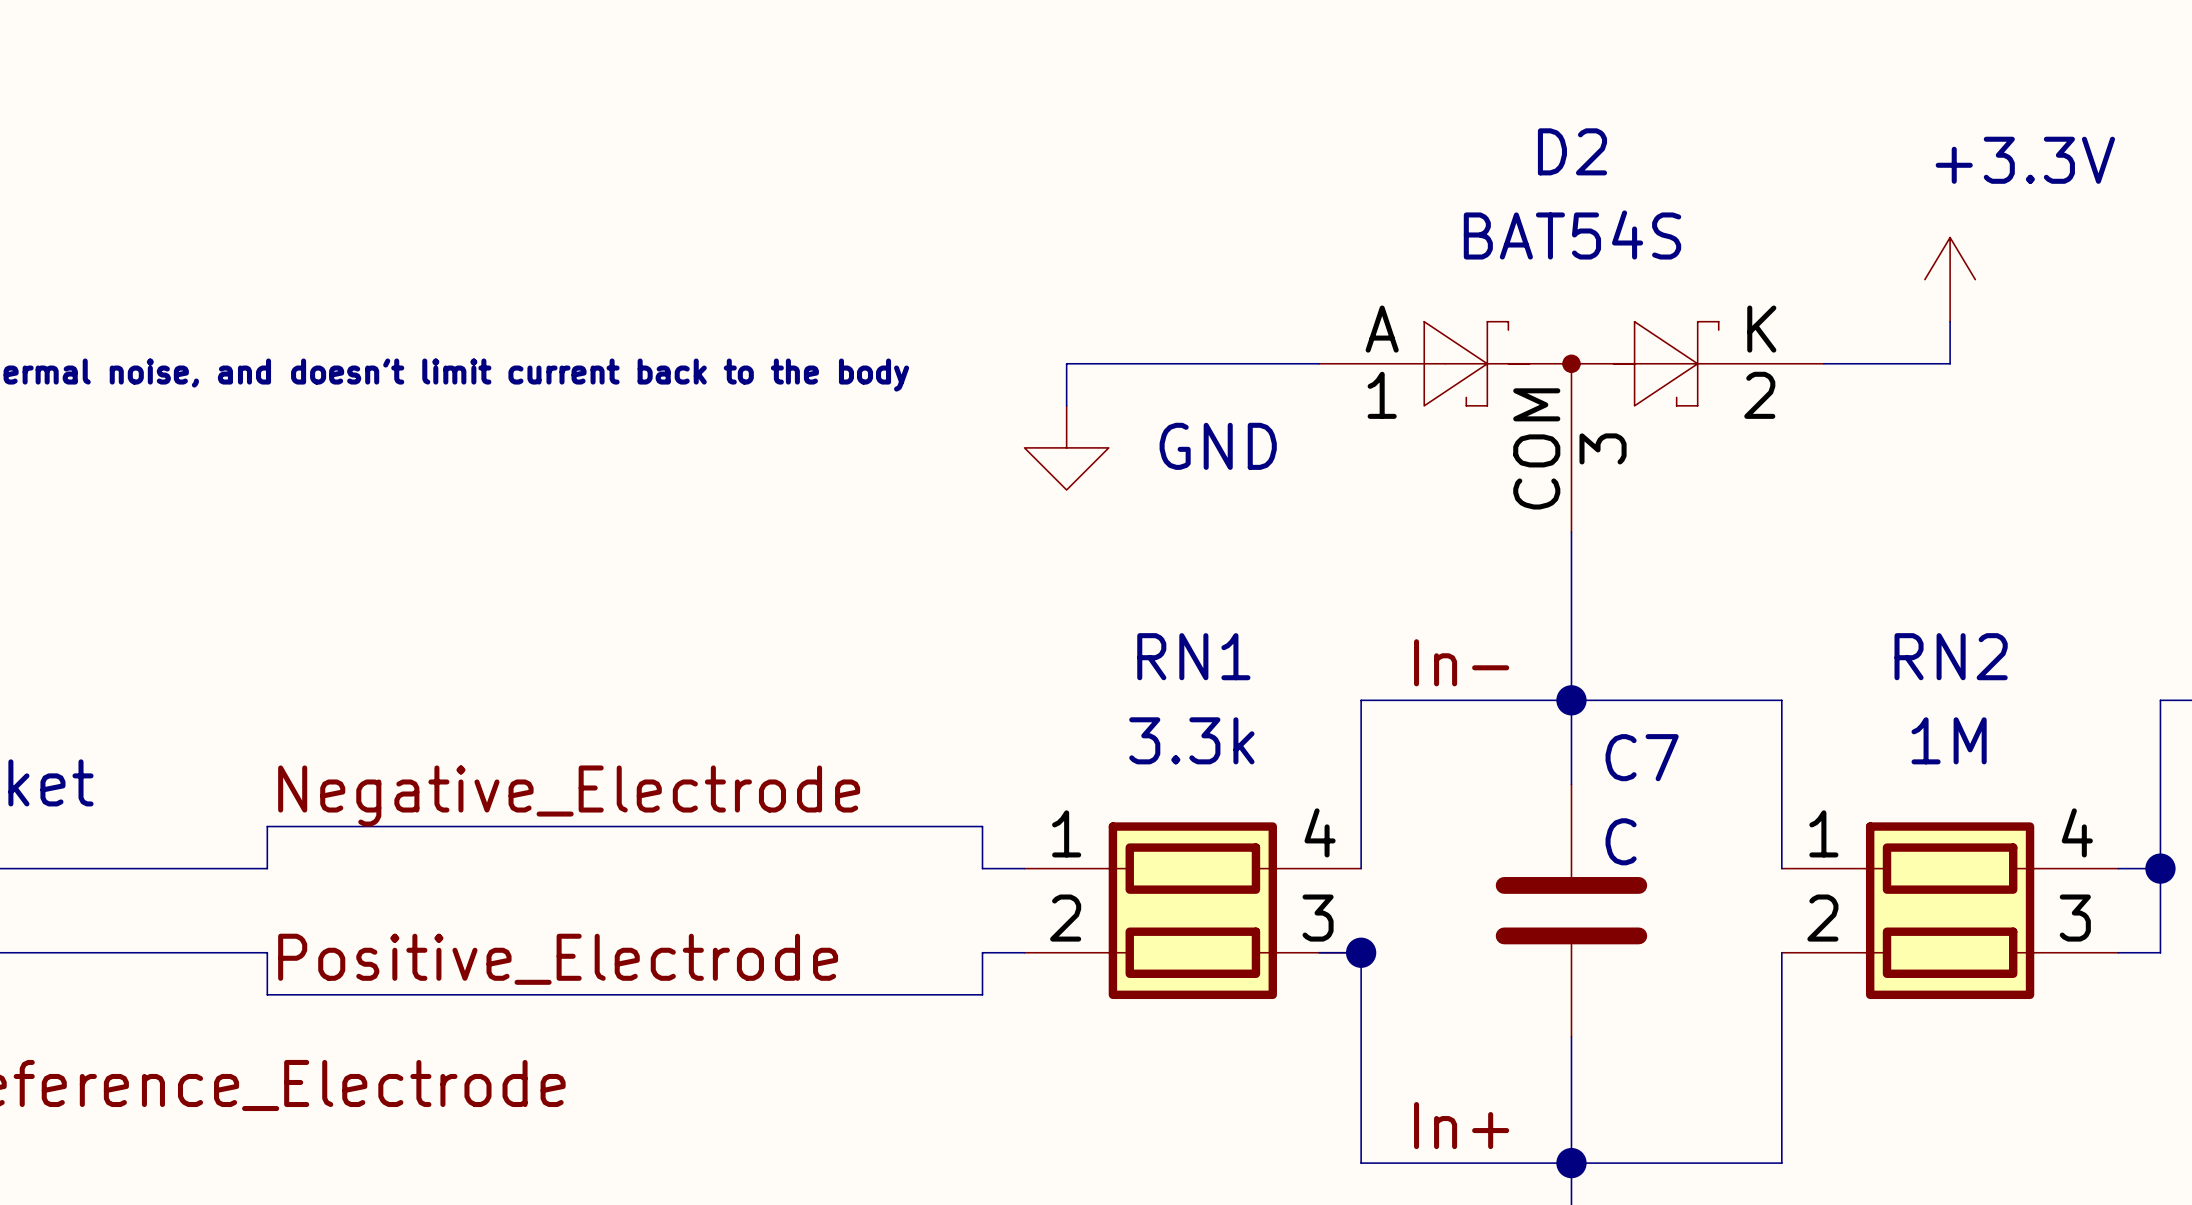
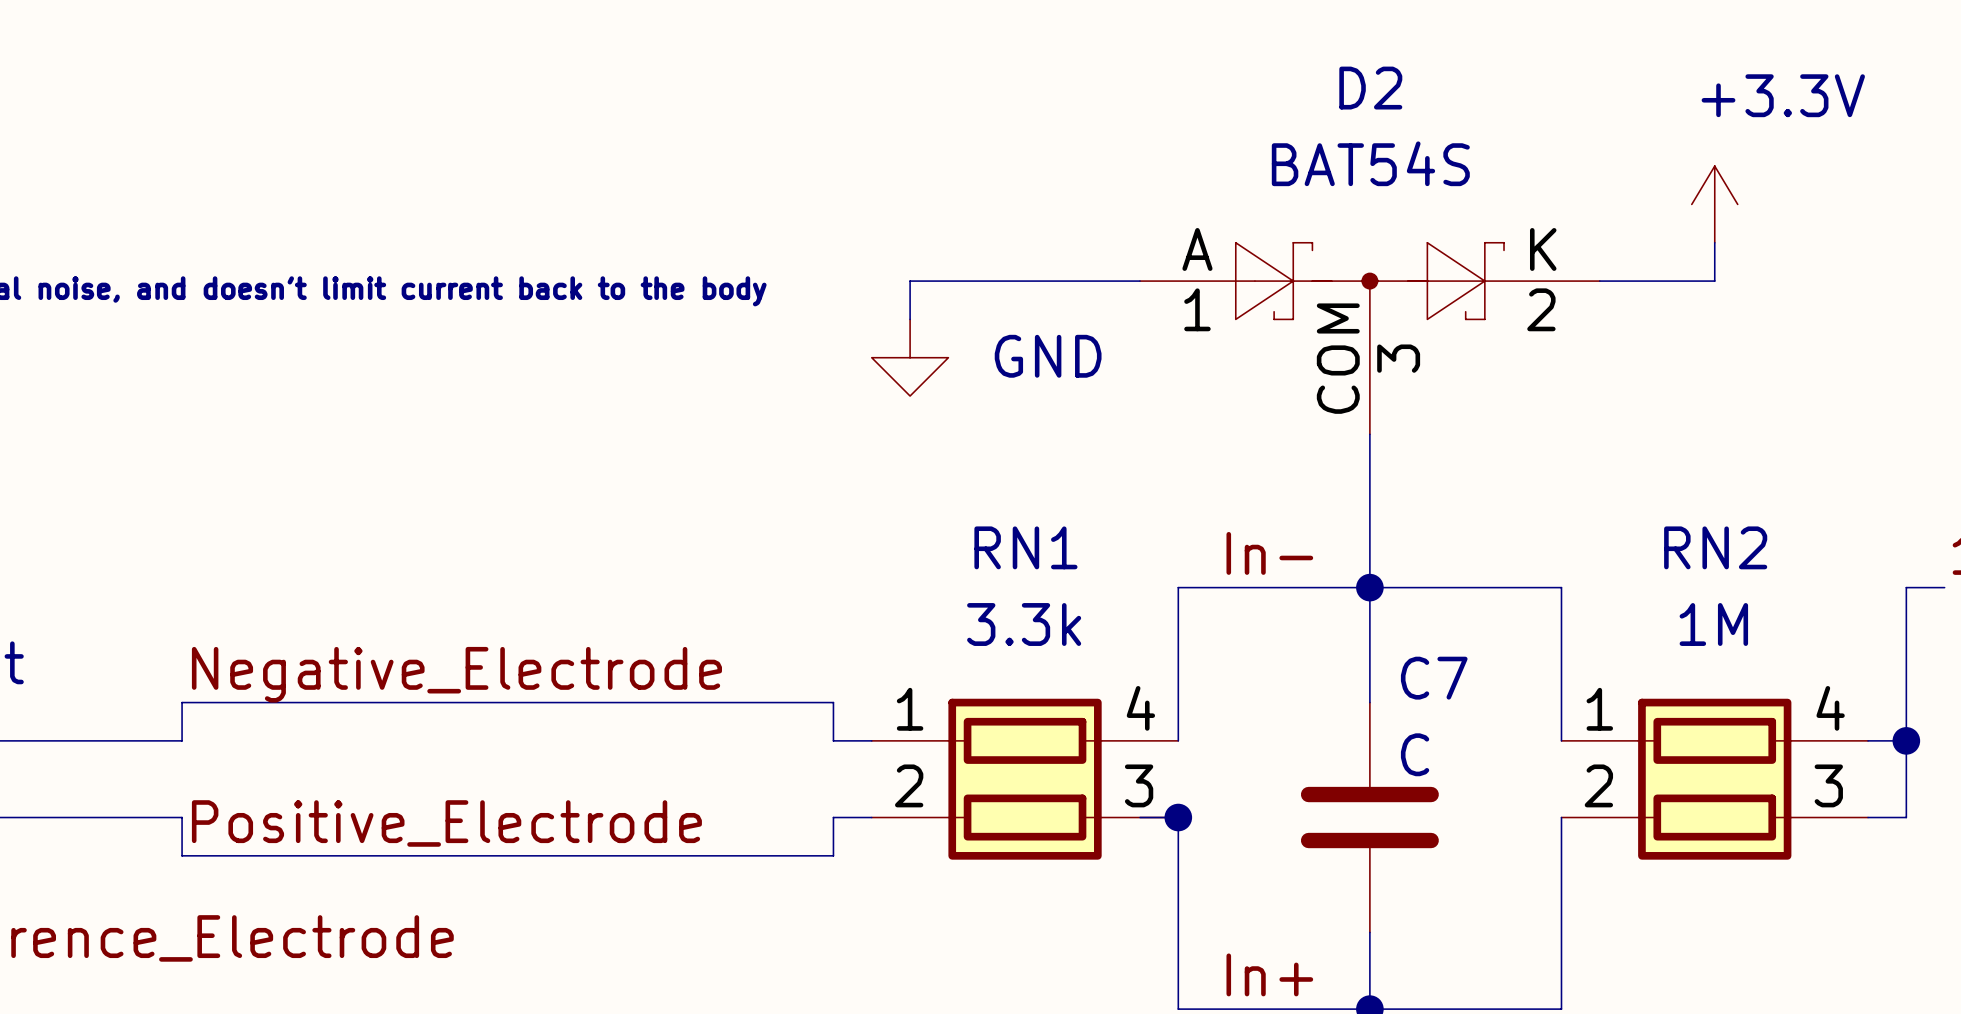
C7 position: (1571, 910) -> (1369, 817)

